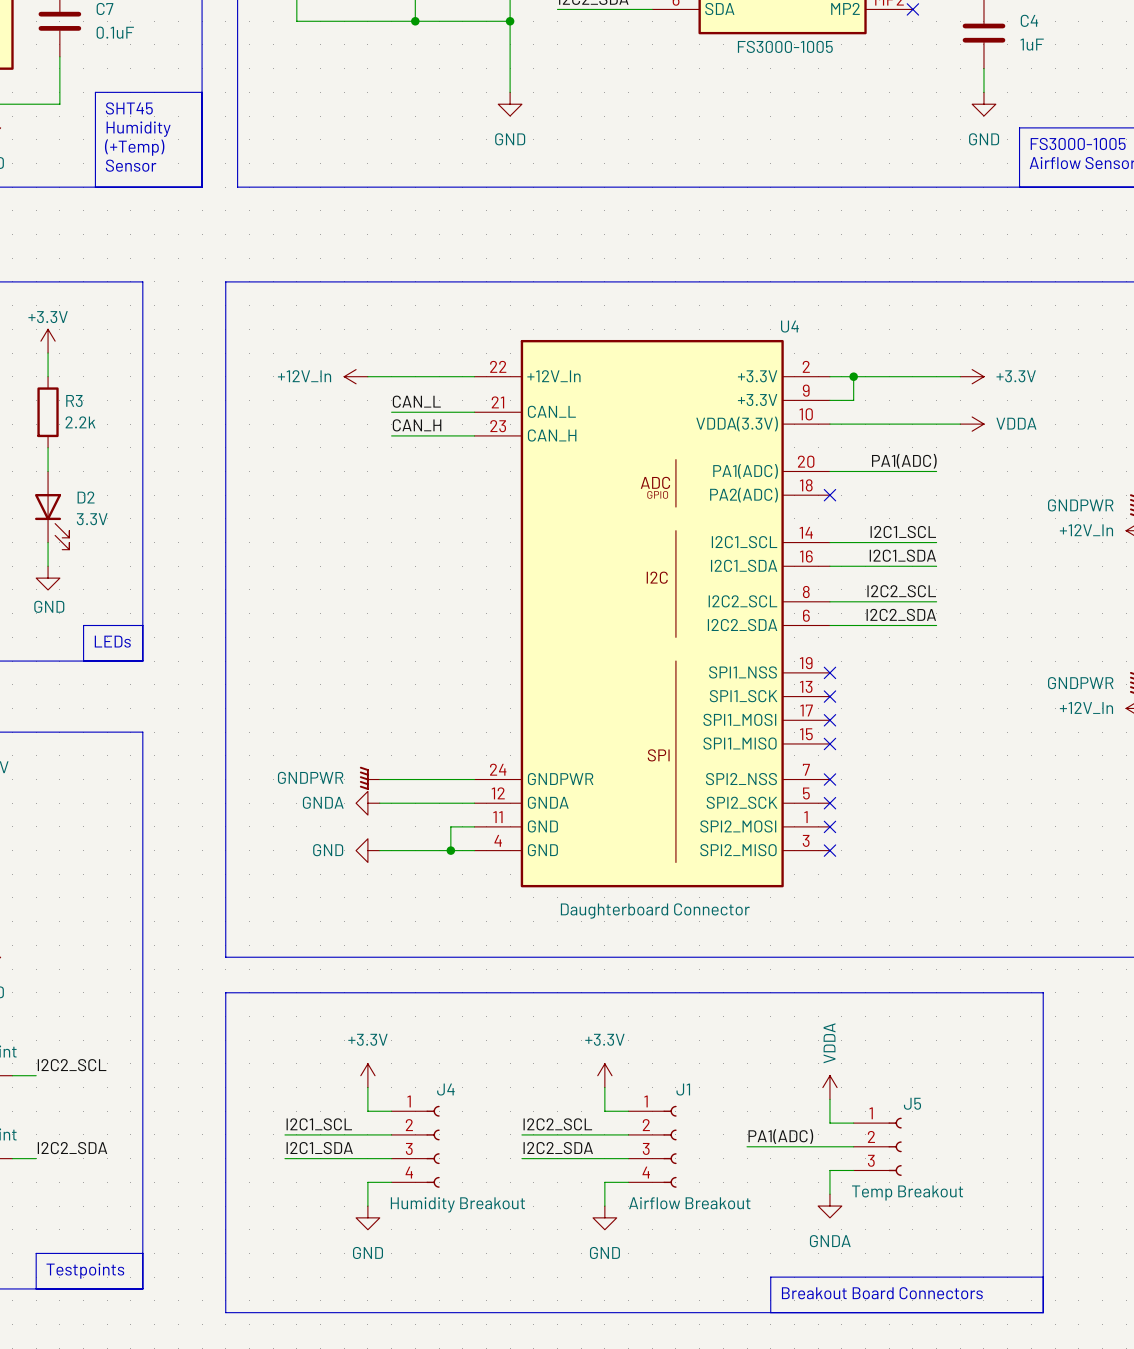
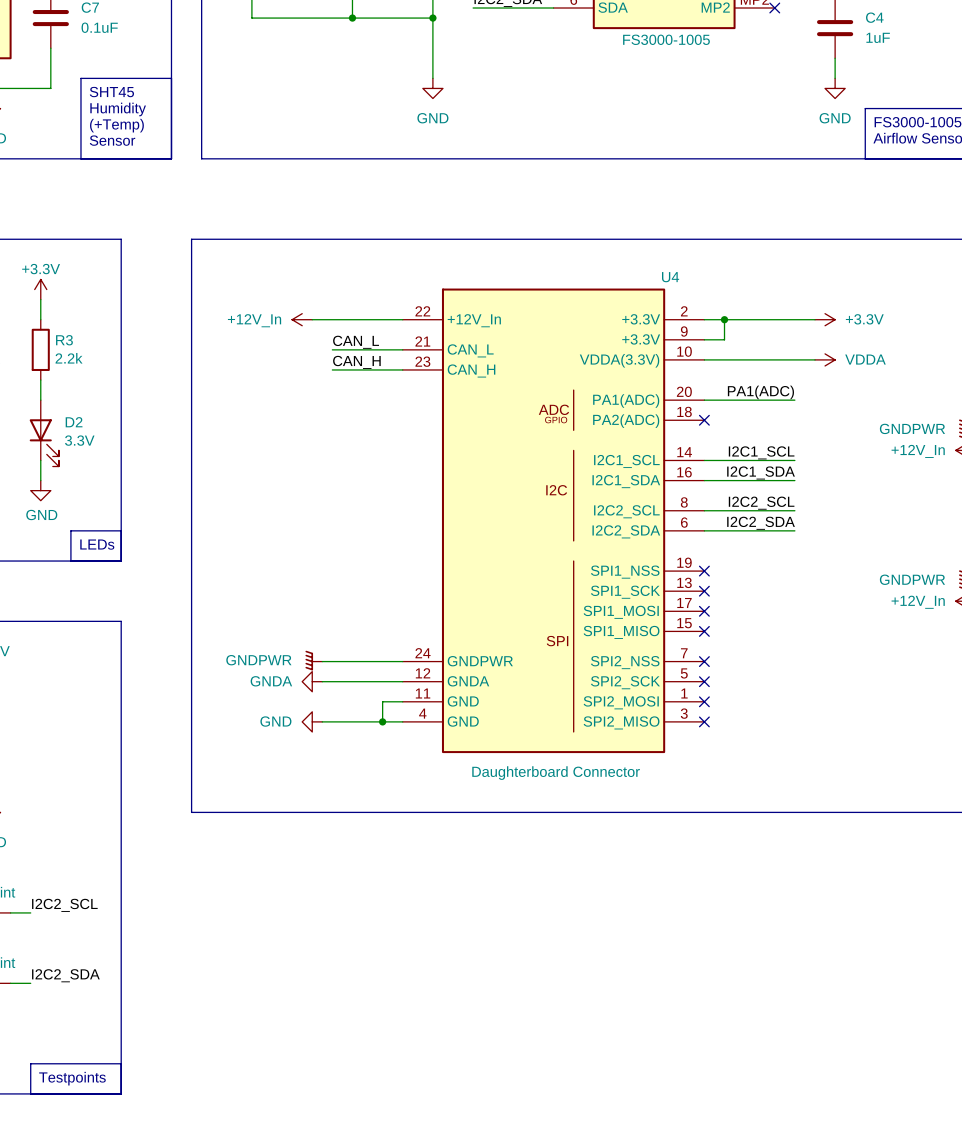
line: (225, 992) (1043, 992) (1043, 1312) (225, 1312) (225, 992) -> none
power symbol: +3.3V (367, 1075) -> none
power symbol: +3.3V (604, 1075) -> none
wire: (367, 1087) (367, 1111) (391, 1111) -> none
wire: (604, 1087) (604, 1111) (628, 1111) -> none
power symbol: VDDA (829, 1087) -> none
wire: (829, 1099) (829, 1123) (853, 1123) -> none
label: I2C1_SCL (319, 1124) -> none
label: I2C2_SCL (557, 1124) -> none
wire: (284, 1134) (391, 1134) -> none
wire: (521, 1134) (628, 1134) -> none
label: PA1(ADC) (780, 1136) -> none
J4: Humidity Breakout (415, 1146) -> none
J1: Airflow Breakout (652, 1146) -> none
wire: (747, 1146) (853, 1146) -> none
J5: Temp Breakout (877, 1146) -> none
label: I2C1_SDA (319, 1148) -> none
label: I2C2_SDA (558, 1148) -> none
wire: (284, 1158) (391, 1158) -> none
wire: (521, 1158) (628, 1158) -> none
wire: (853, 1170) (829, 1170) (829, 1194) -> none
wire: (391, 1182) (367, 1182) (367, 1206) -> none
wire: (628, 1182) (604, 1182) (604, 1206) -> none
power symbol: GNDA (829, 1206) -> none
power symbol: GND (367, 1217) -> none
power symbol: GND (604, 1217) -> none
line: (1043, 1277) (770, 1277) (770, 1312) -> none
text: Breakout Board Connectors (882, 1293) -> none

